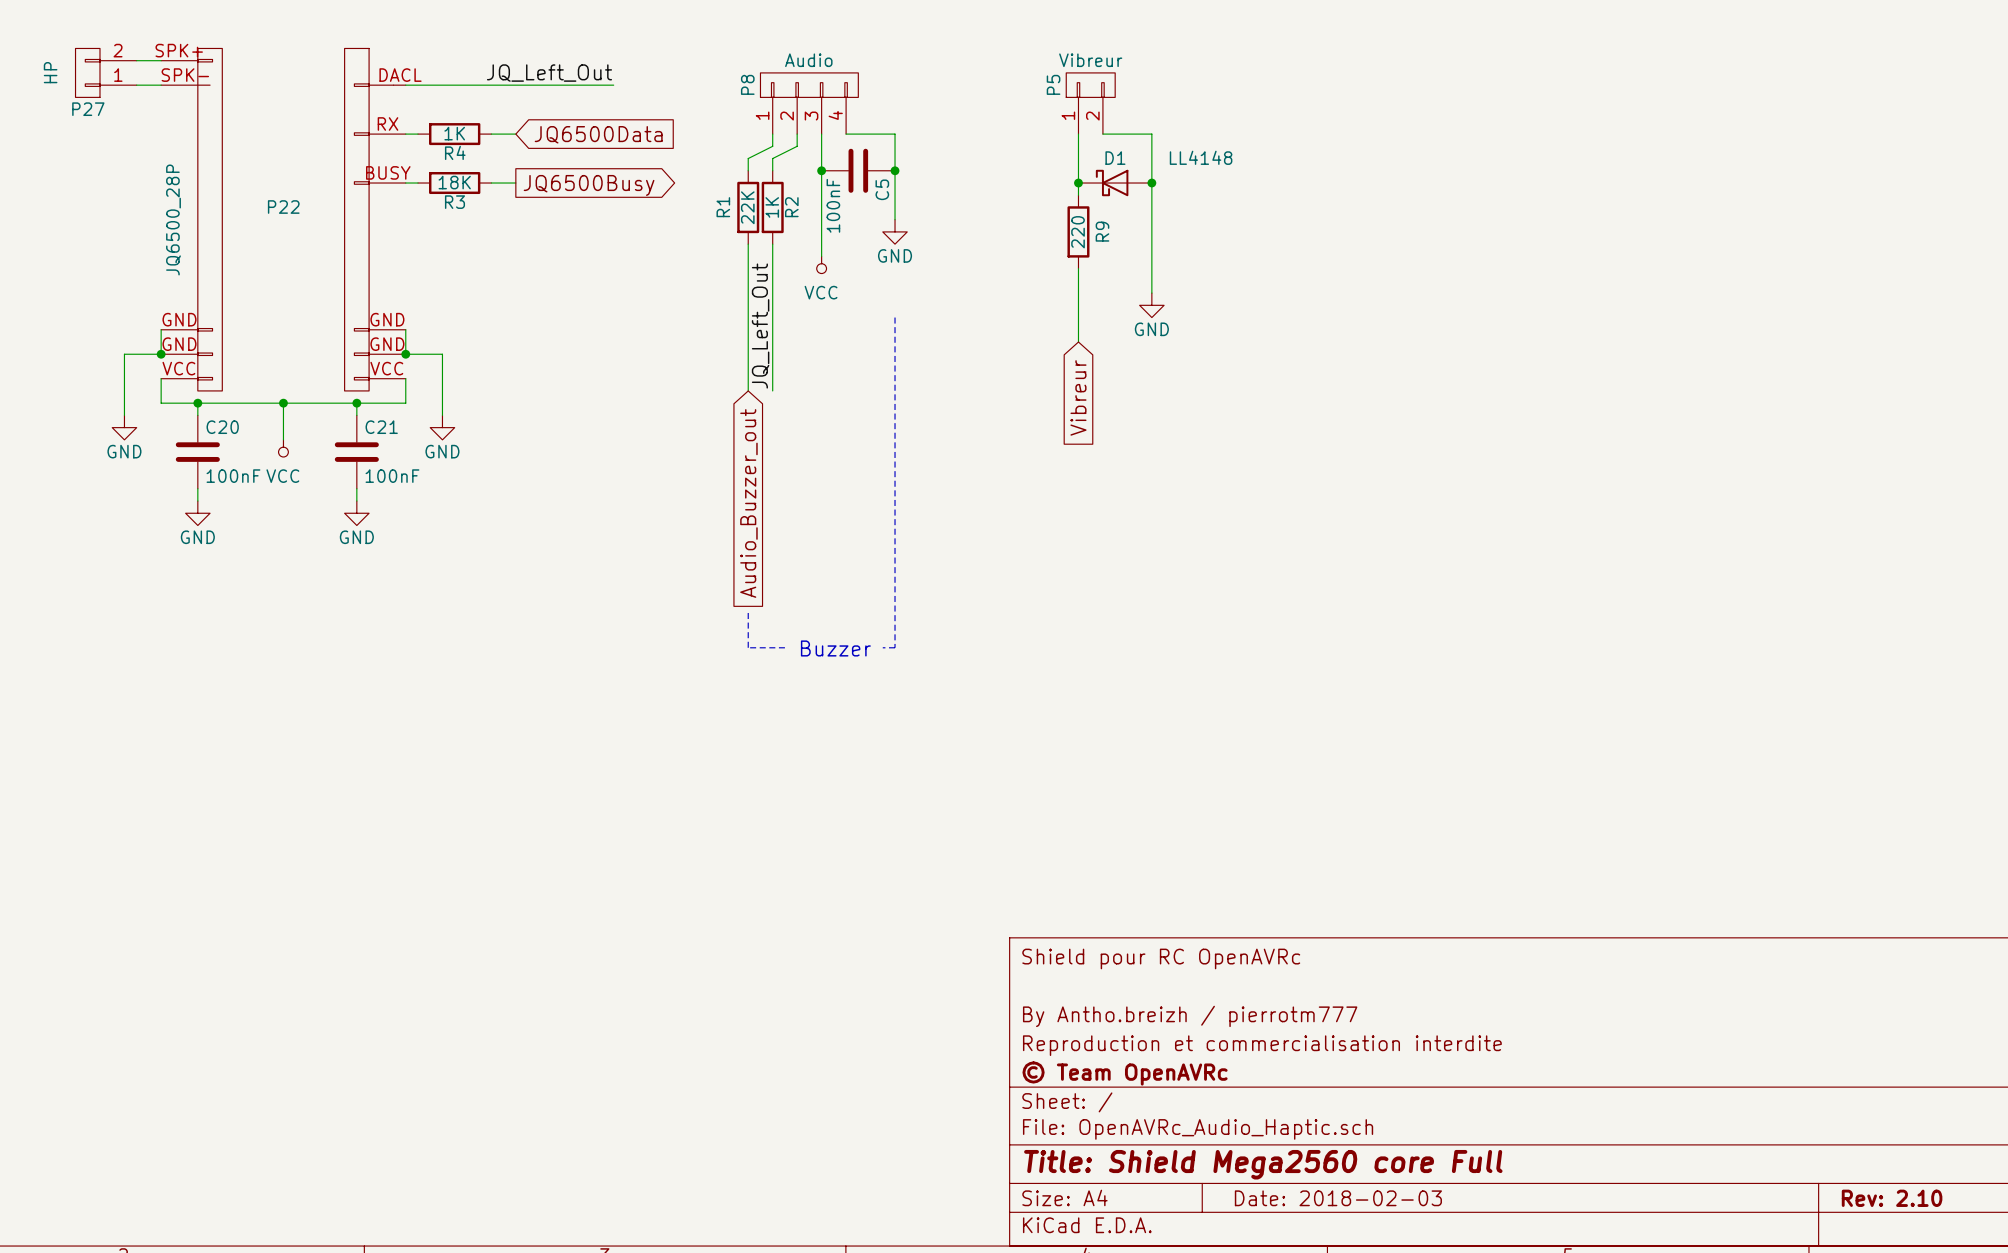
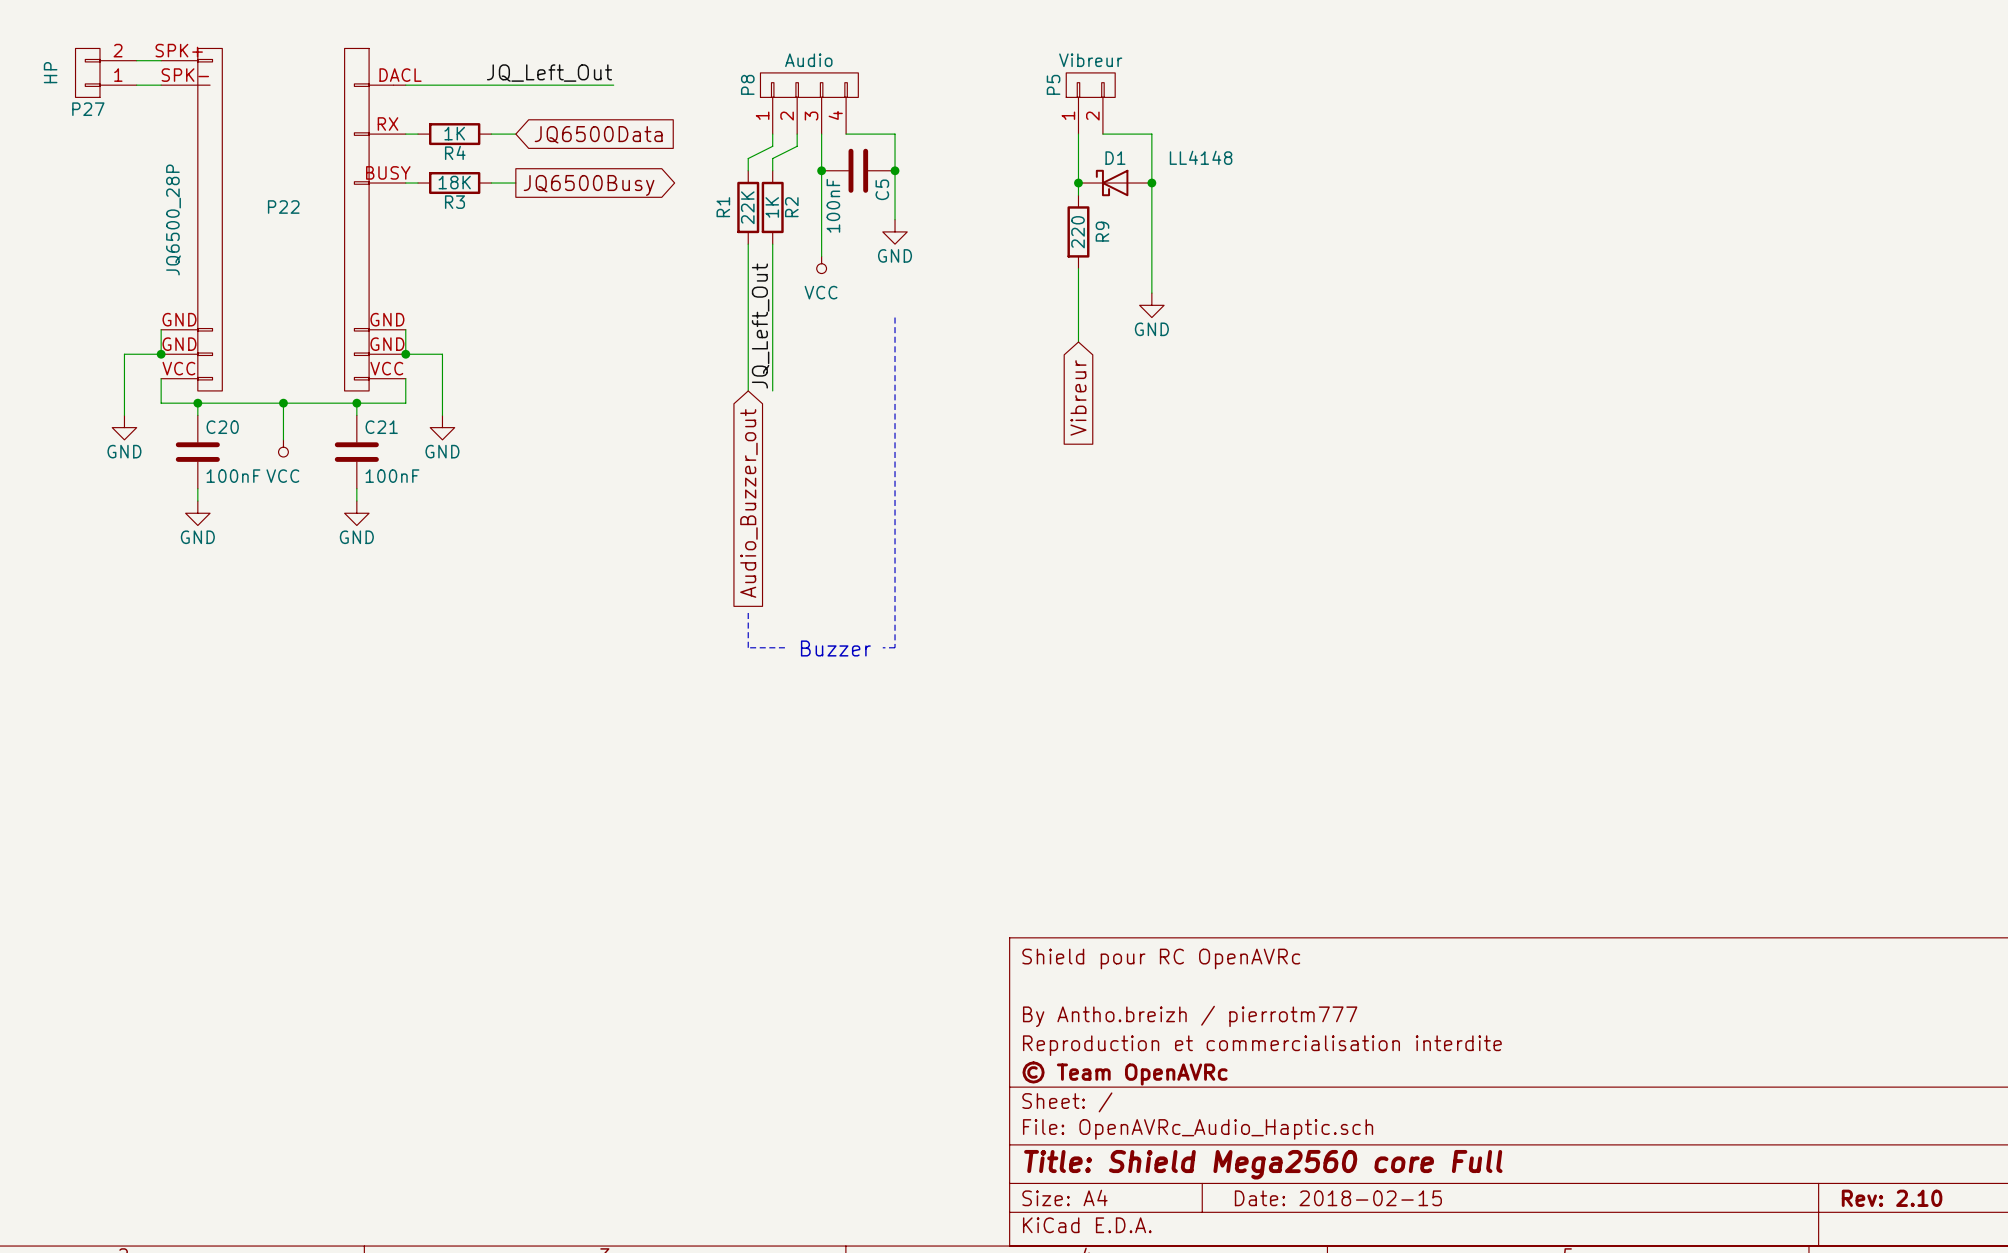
title block: Date: 2018-02-03 (1338, 1198) -> Date: 2018-02-15 (1338, 1198)

